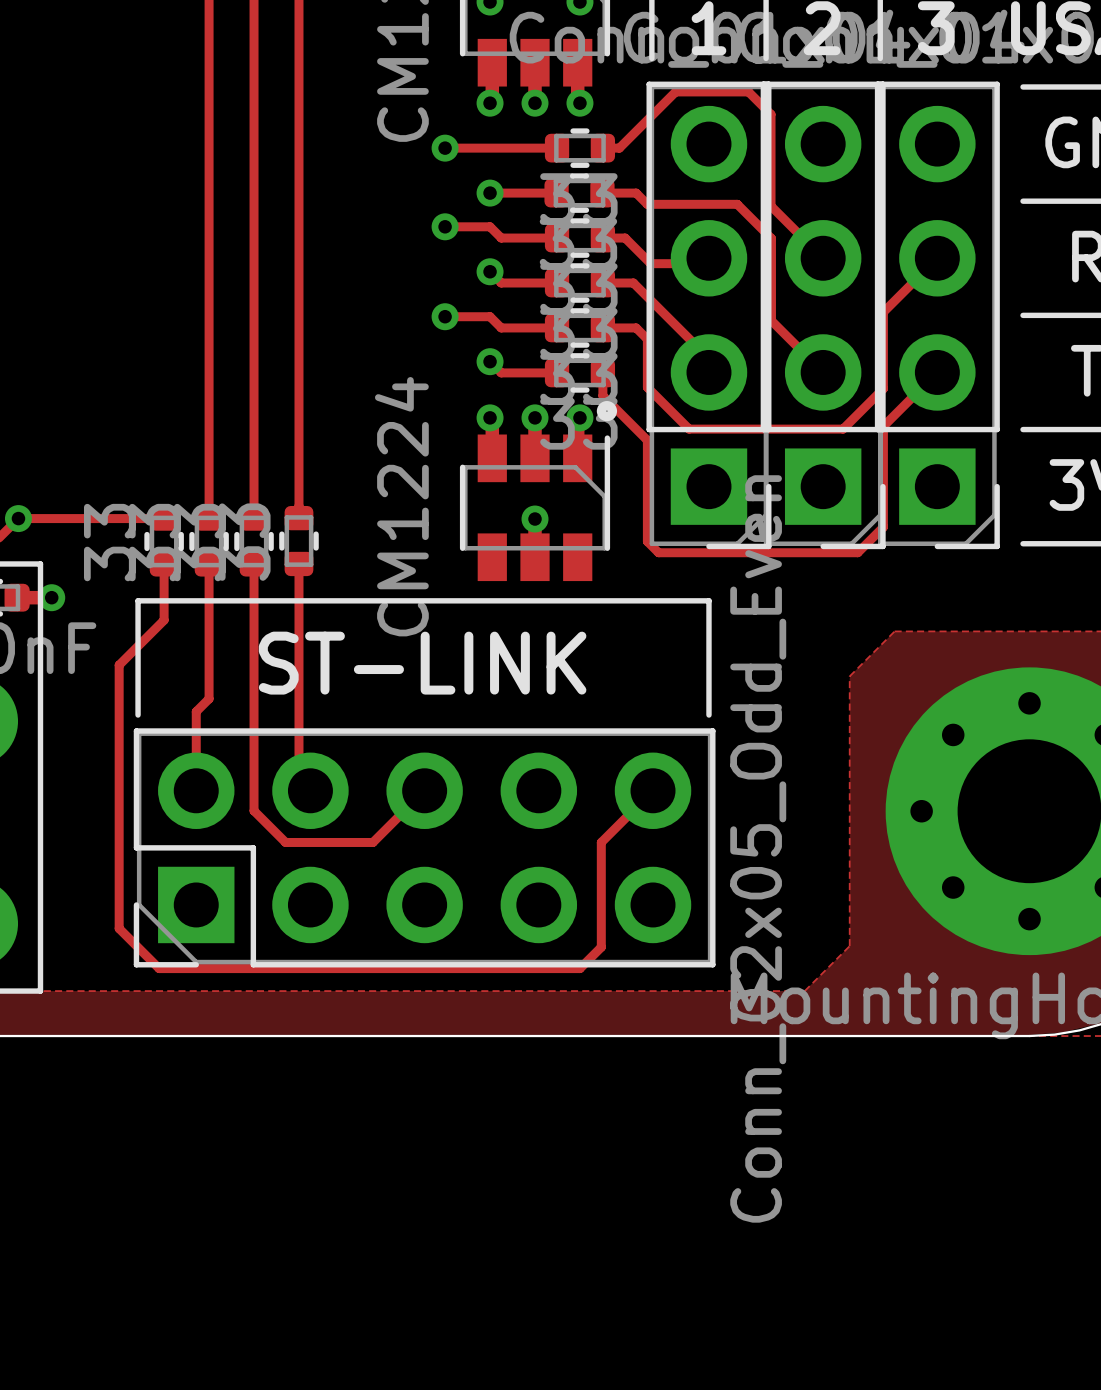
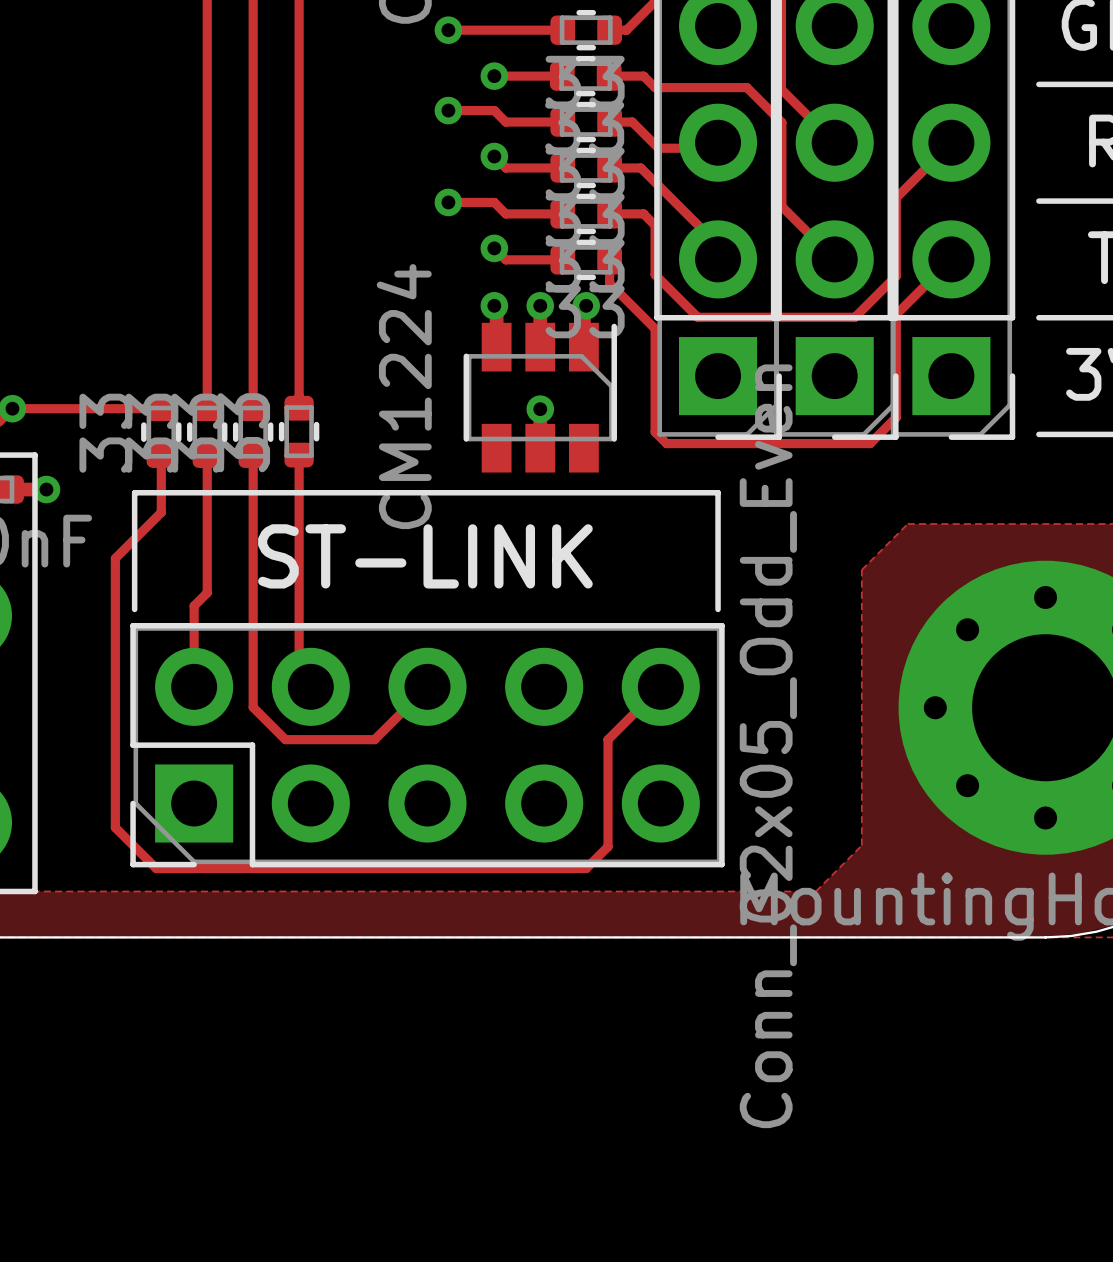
drawing: [596, 401, 618, 422] -> none

